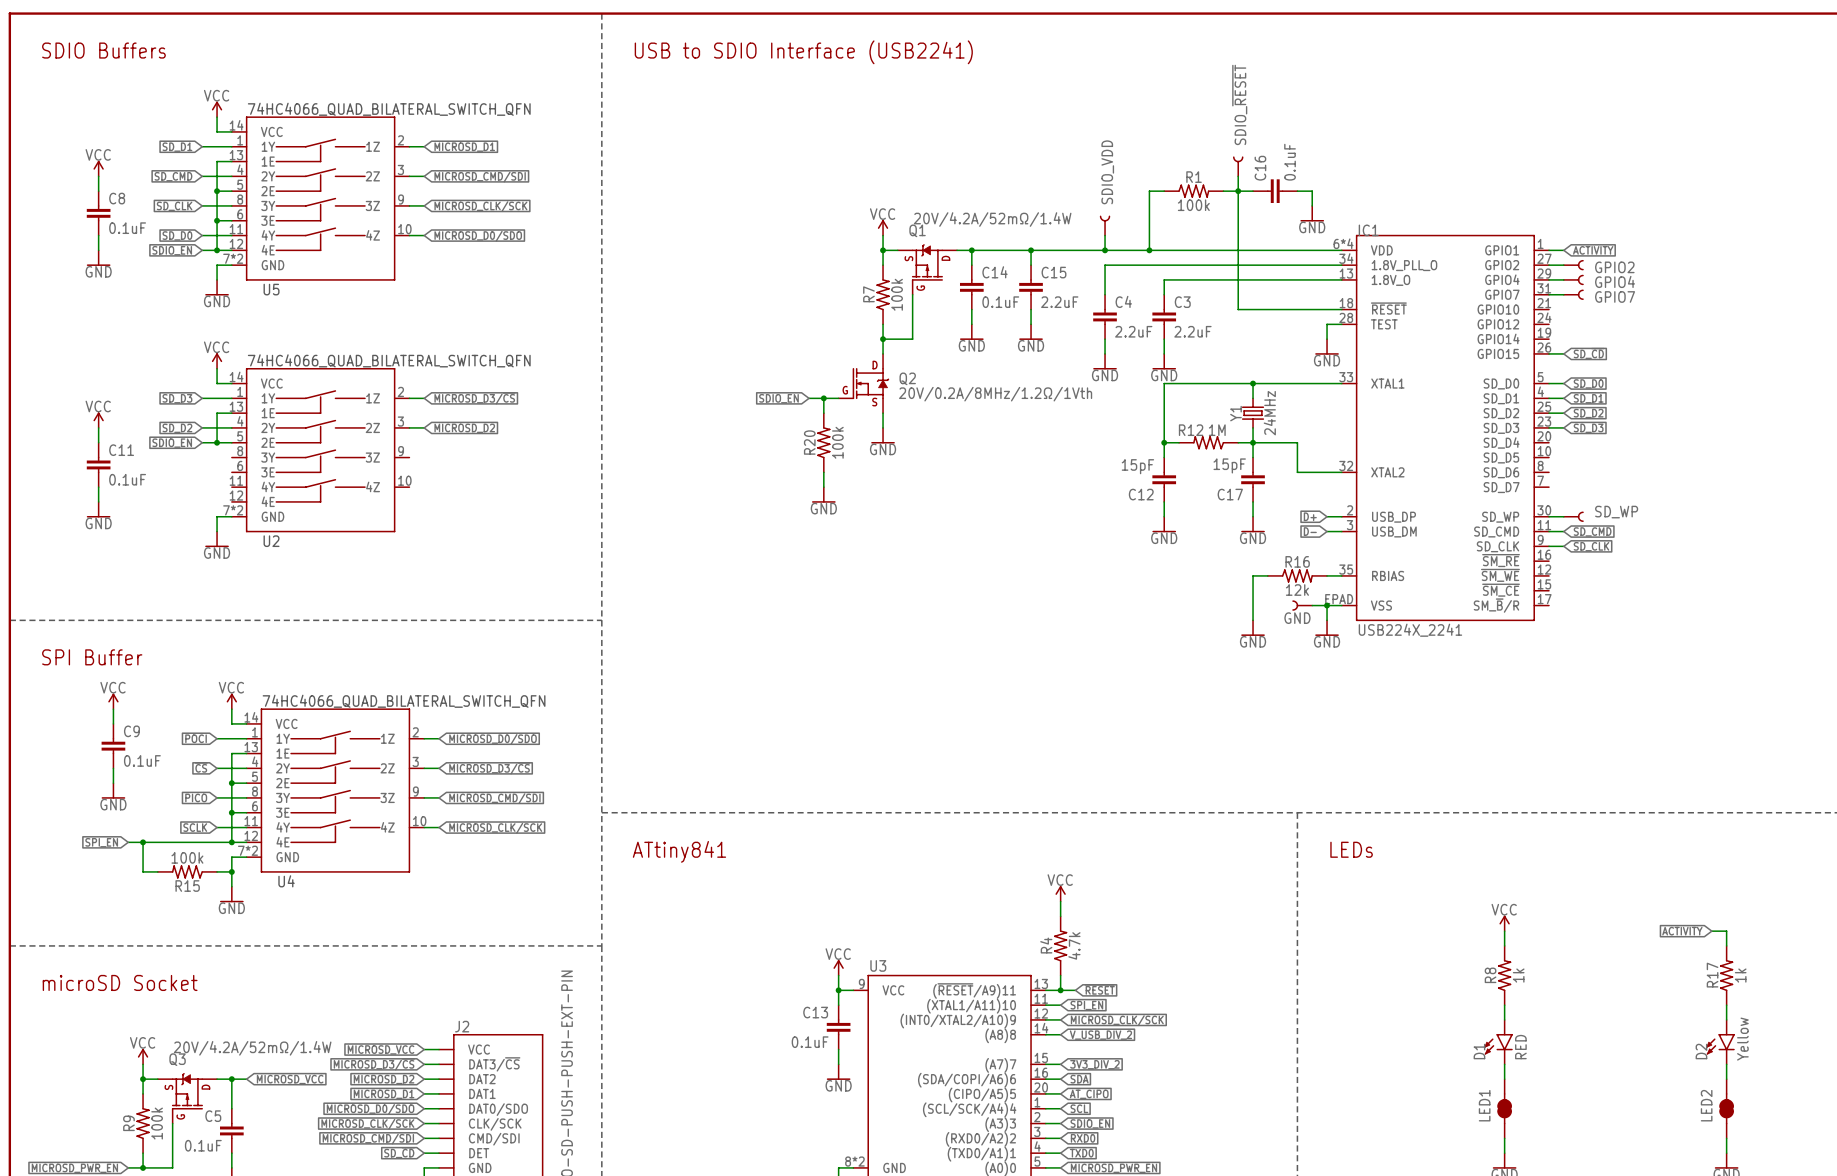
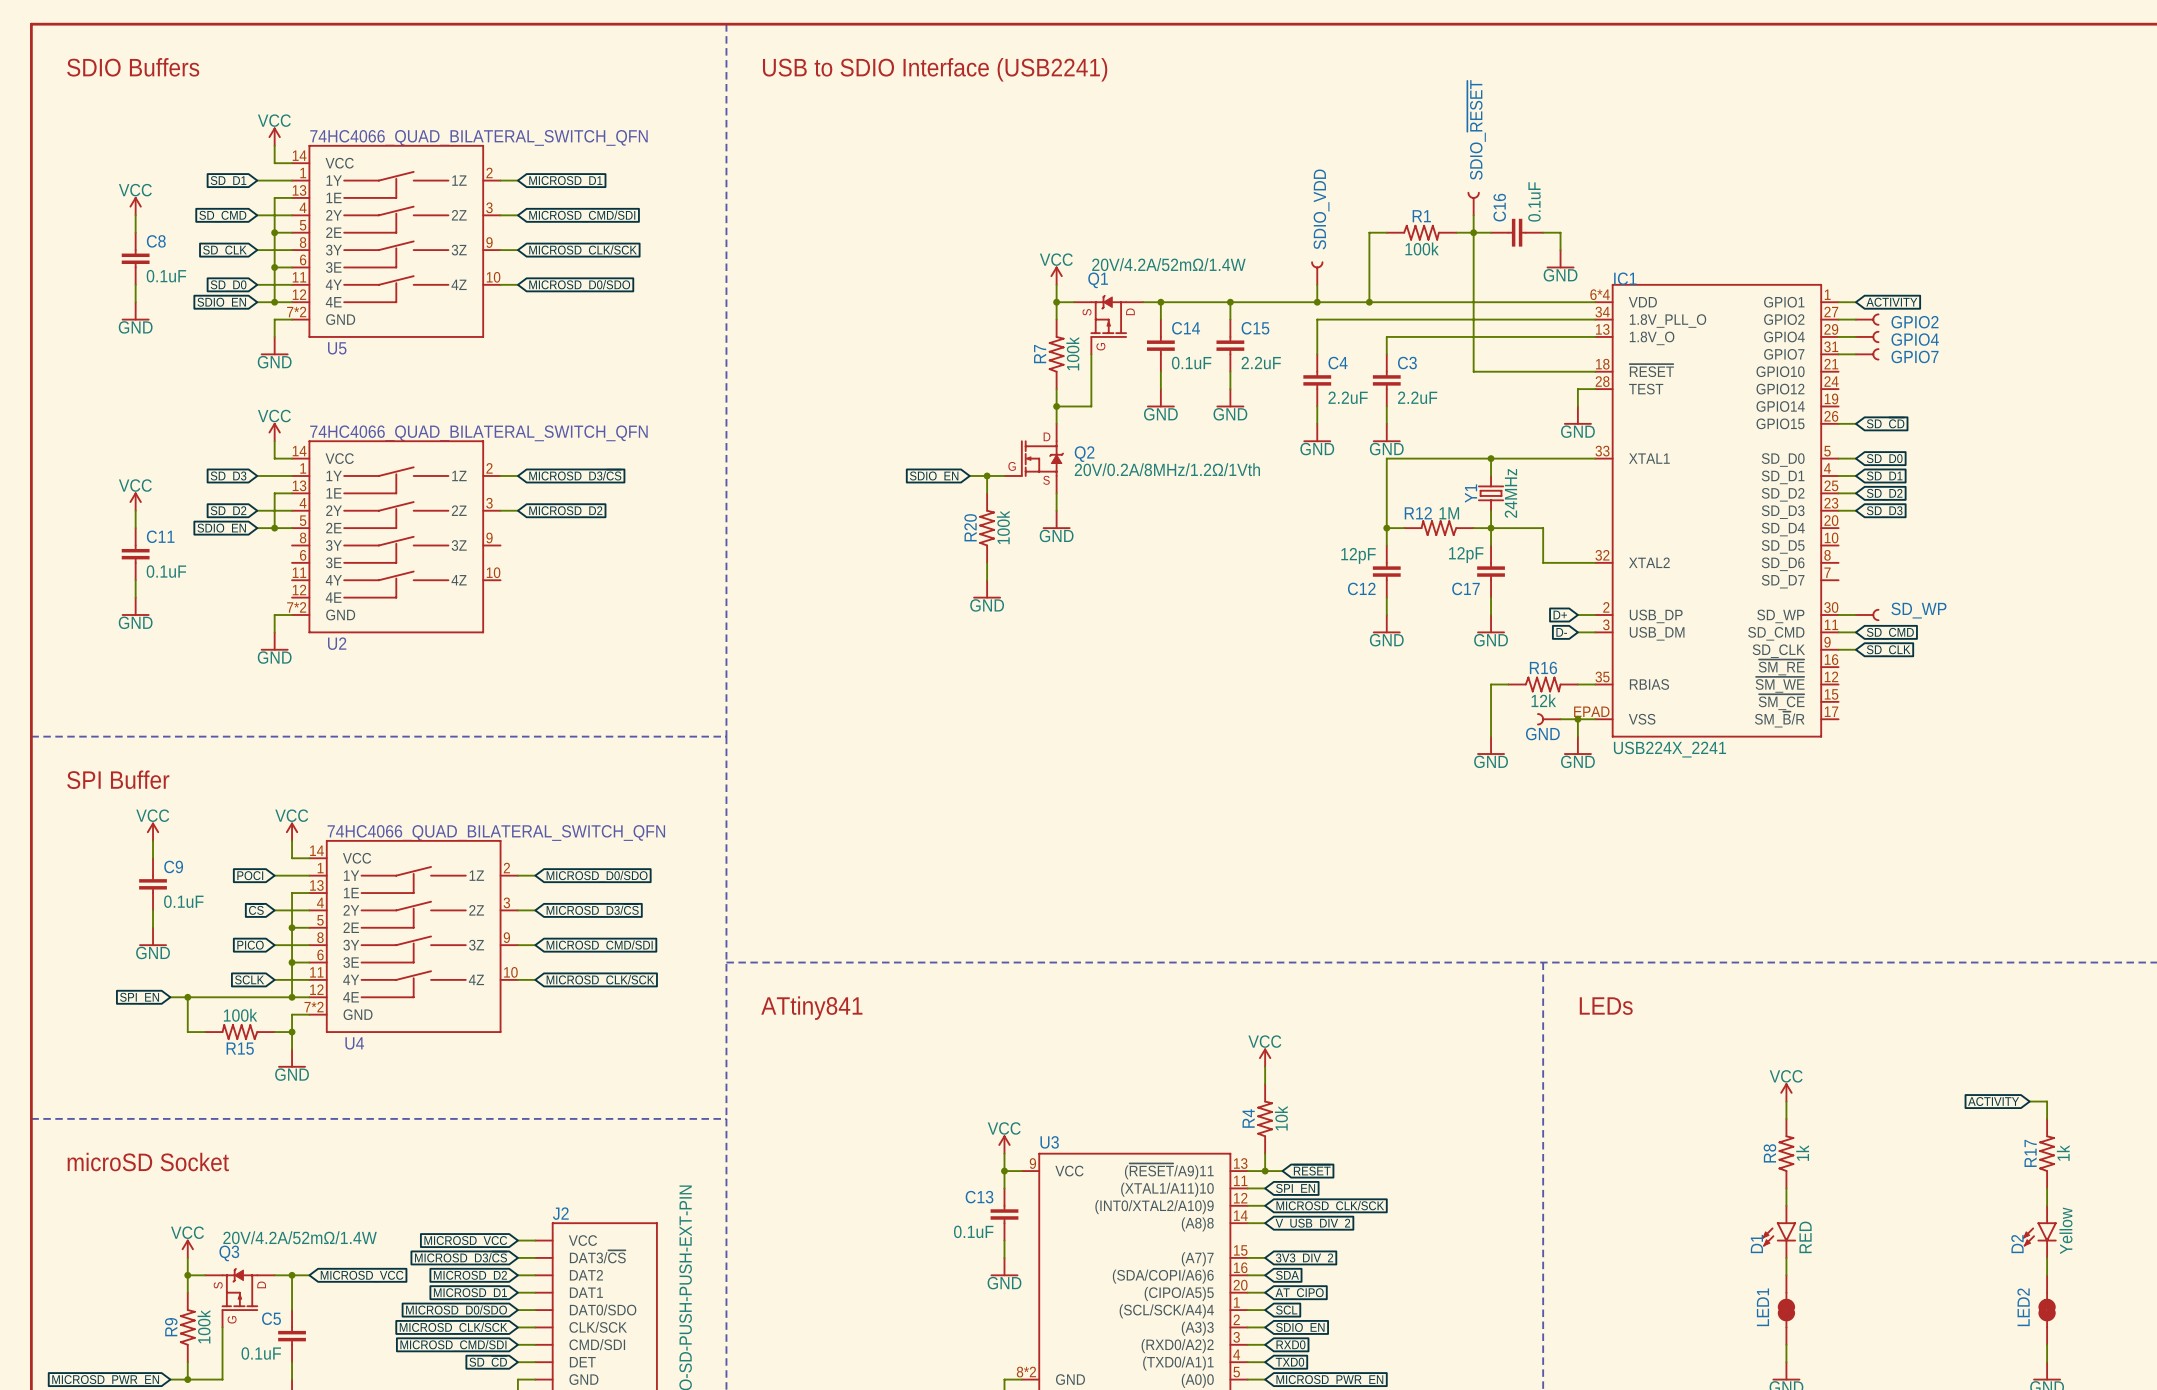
C17 value: 15pF (1229, 465) -> 12pF (1466, 555)
C12 value: 15pF (1137, 466) -> 12pF (1358, 555)
R4 value: 4.7k (1074, 945) -> 10k (1281, 1118)

